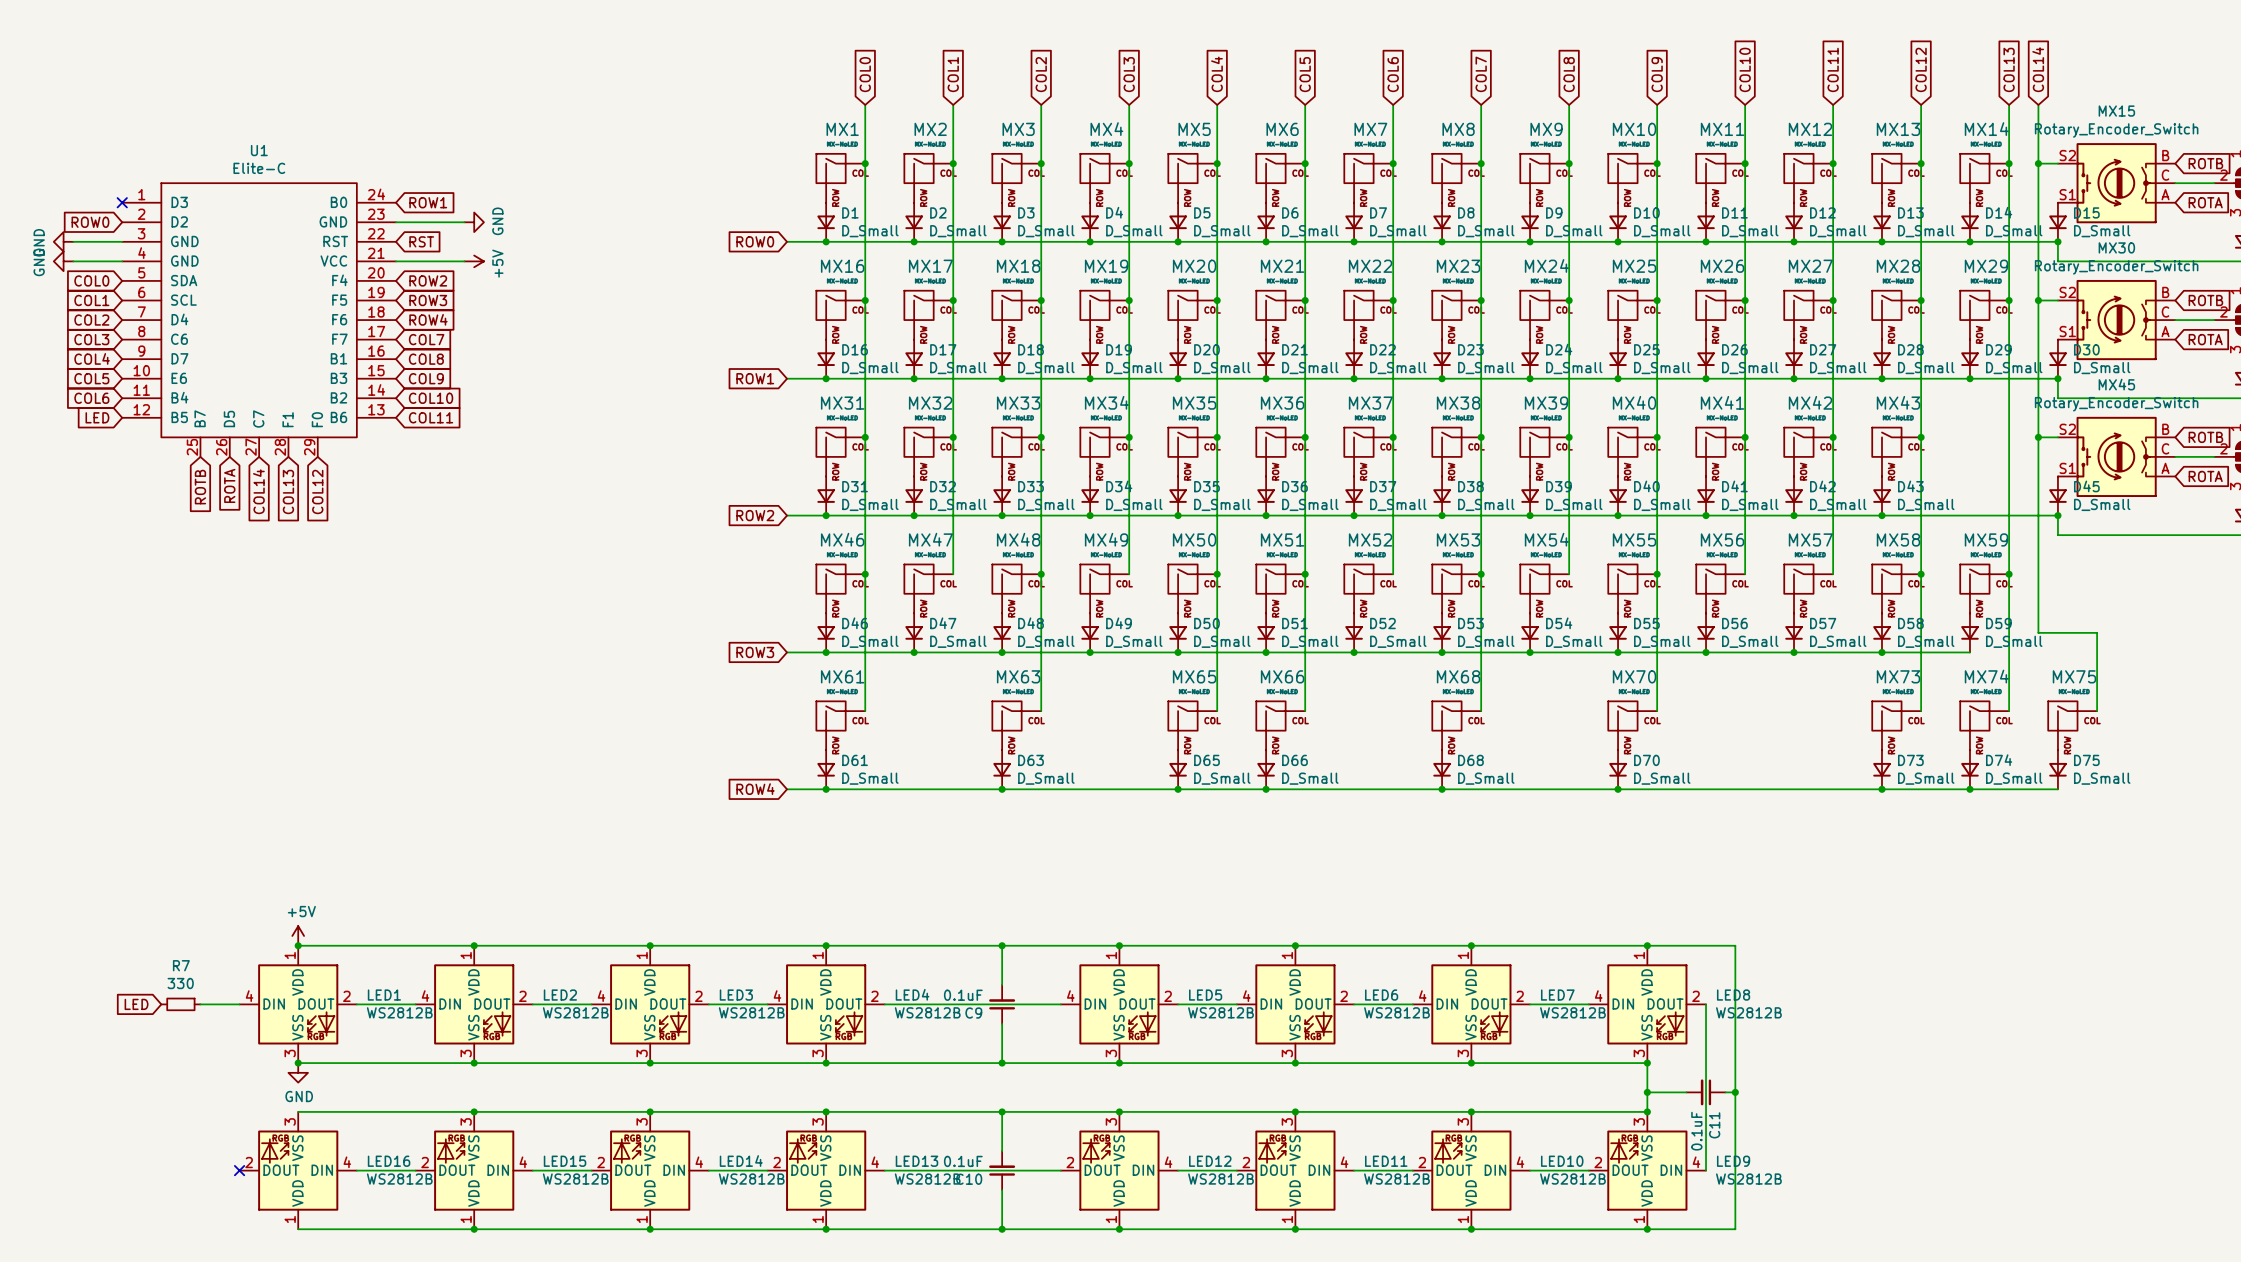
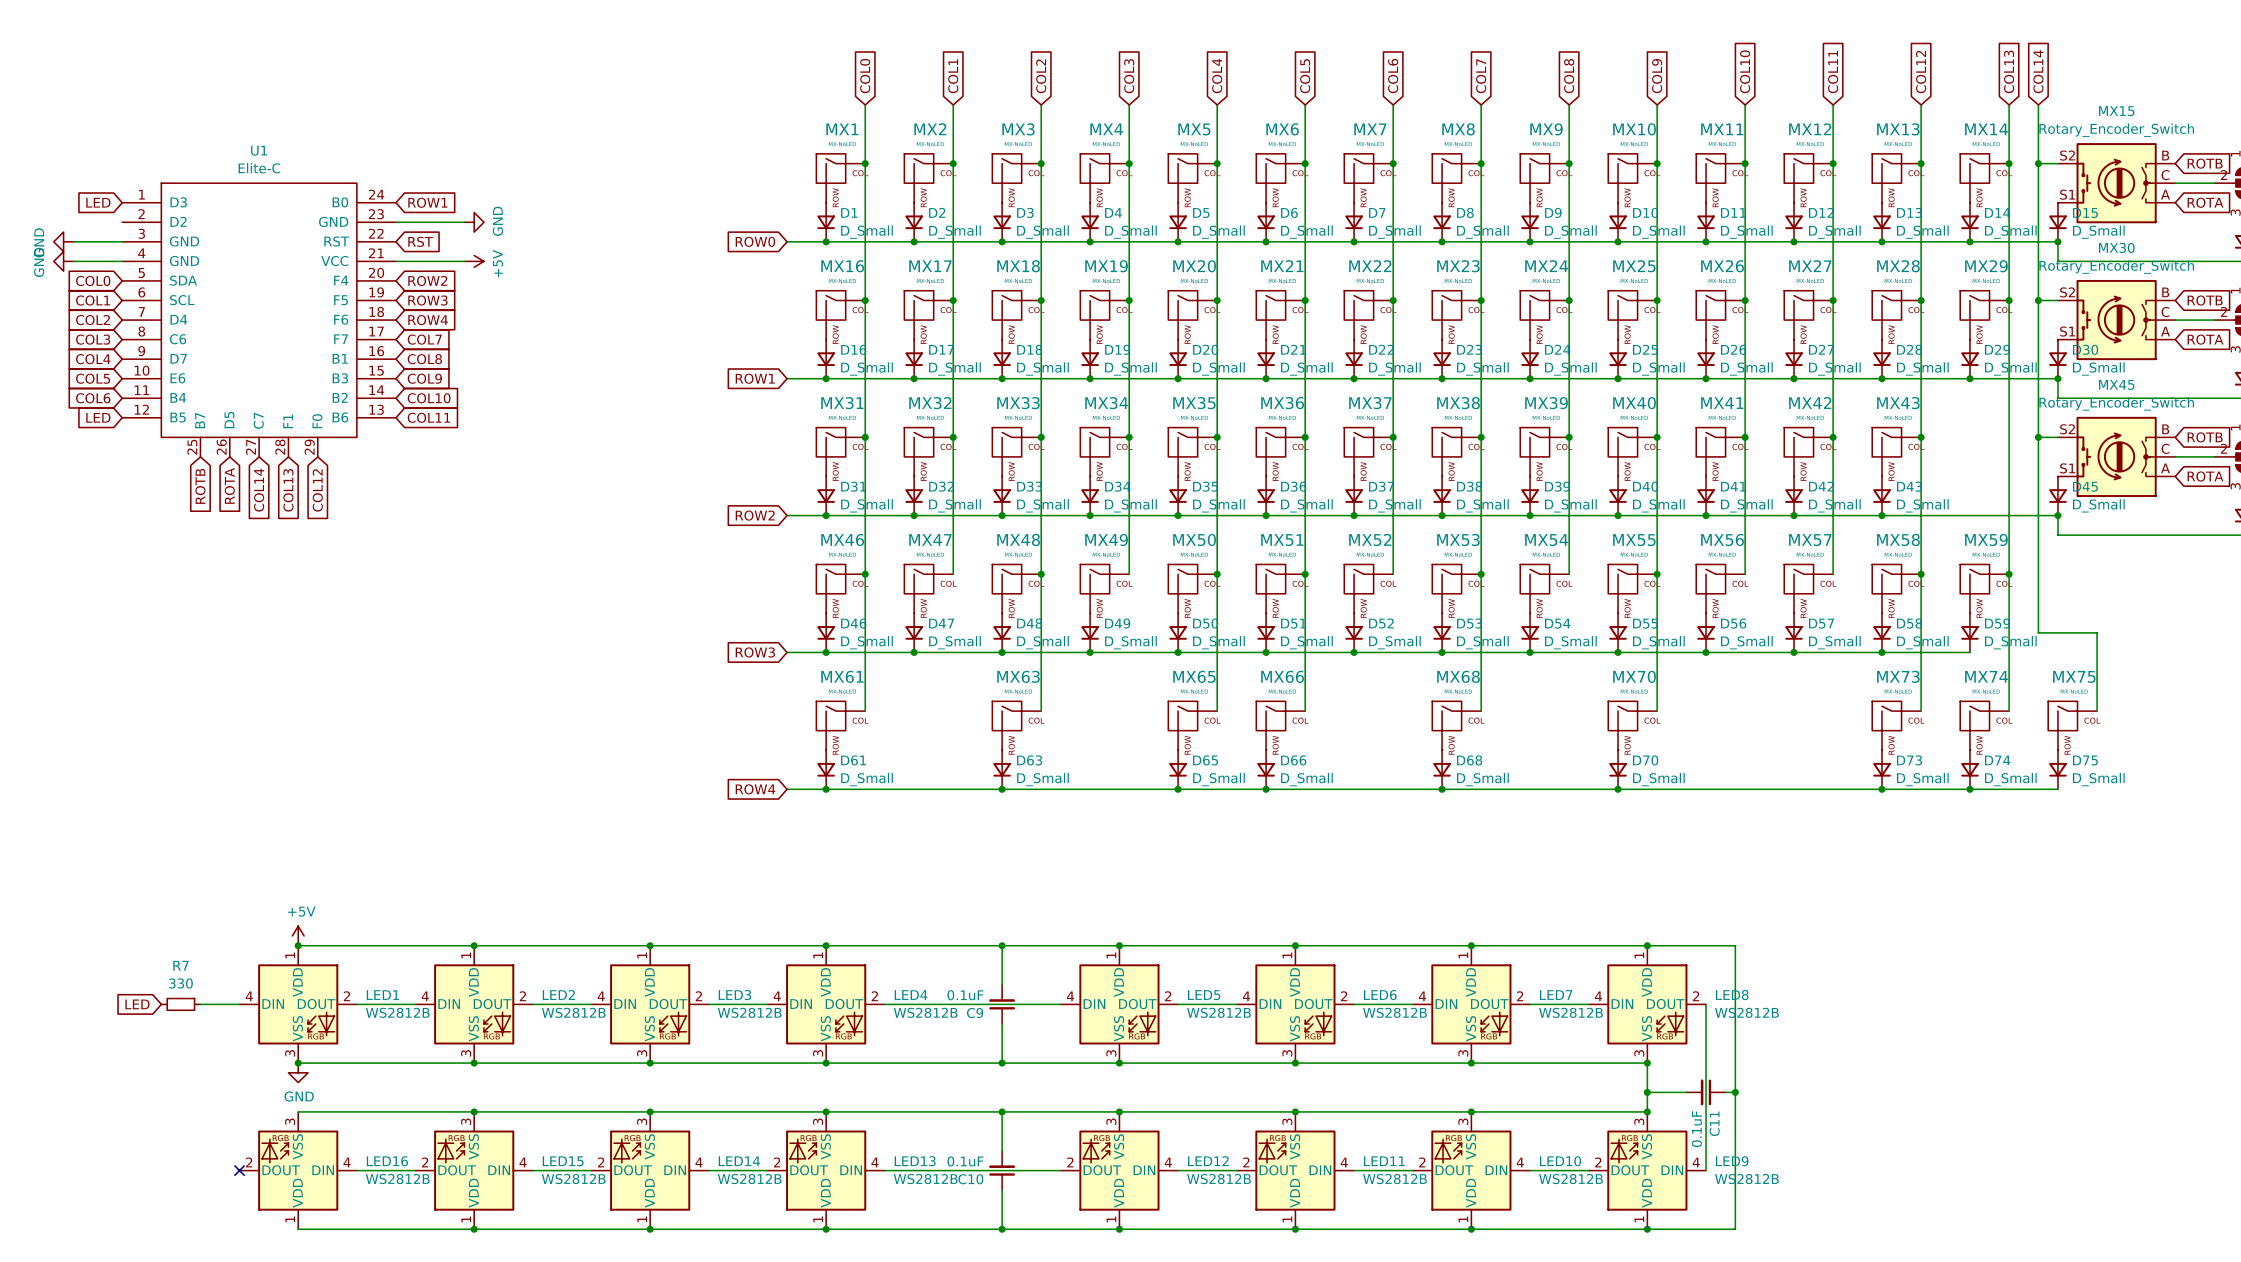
global label: none -> LED (98, 202)
no-connect mark: (122, 202) -> none
global label: ROW0 (90, 222) -> none

